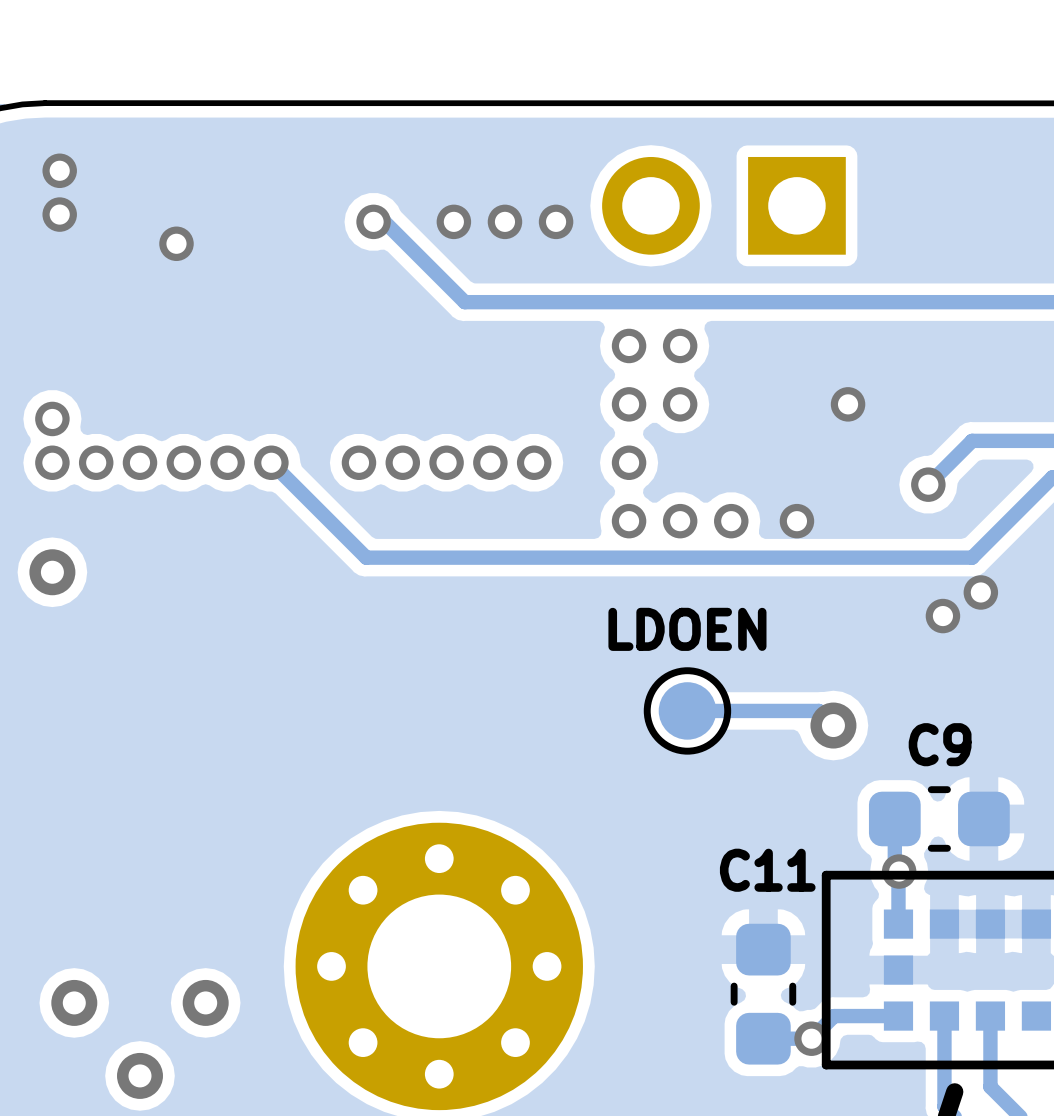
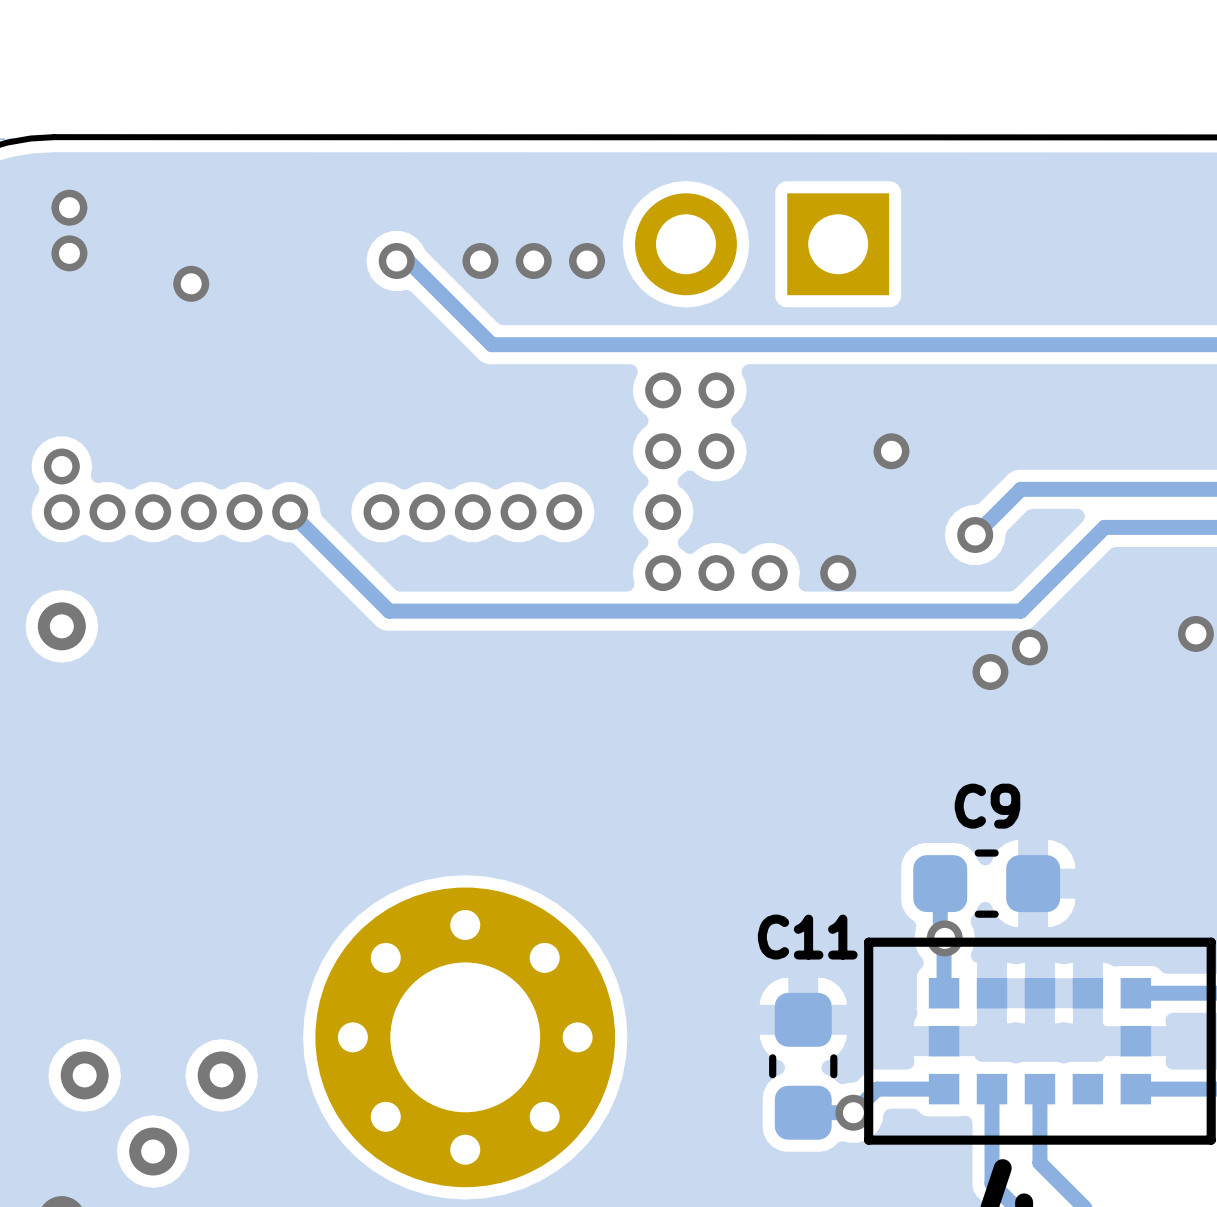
text: LDOEN (687, 629) -> none
track: (687, 710) (818, 710) (833, 725) -> none
part: (687, 710) -> none
via: (833, 725) -> none

